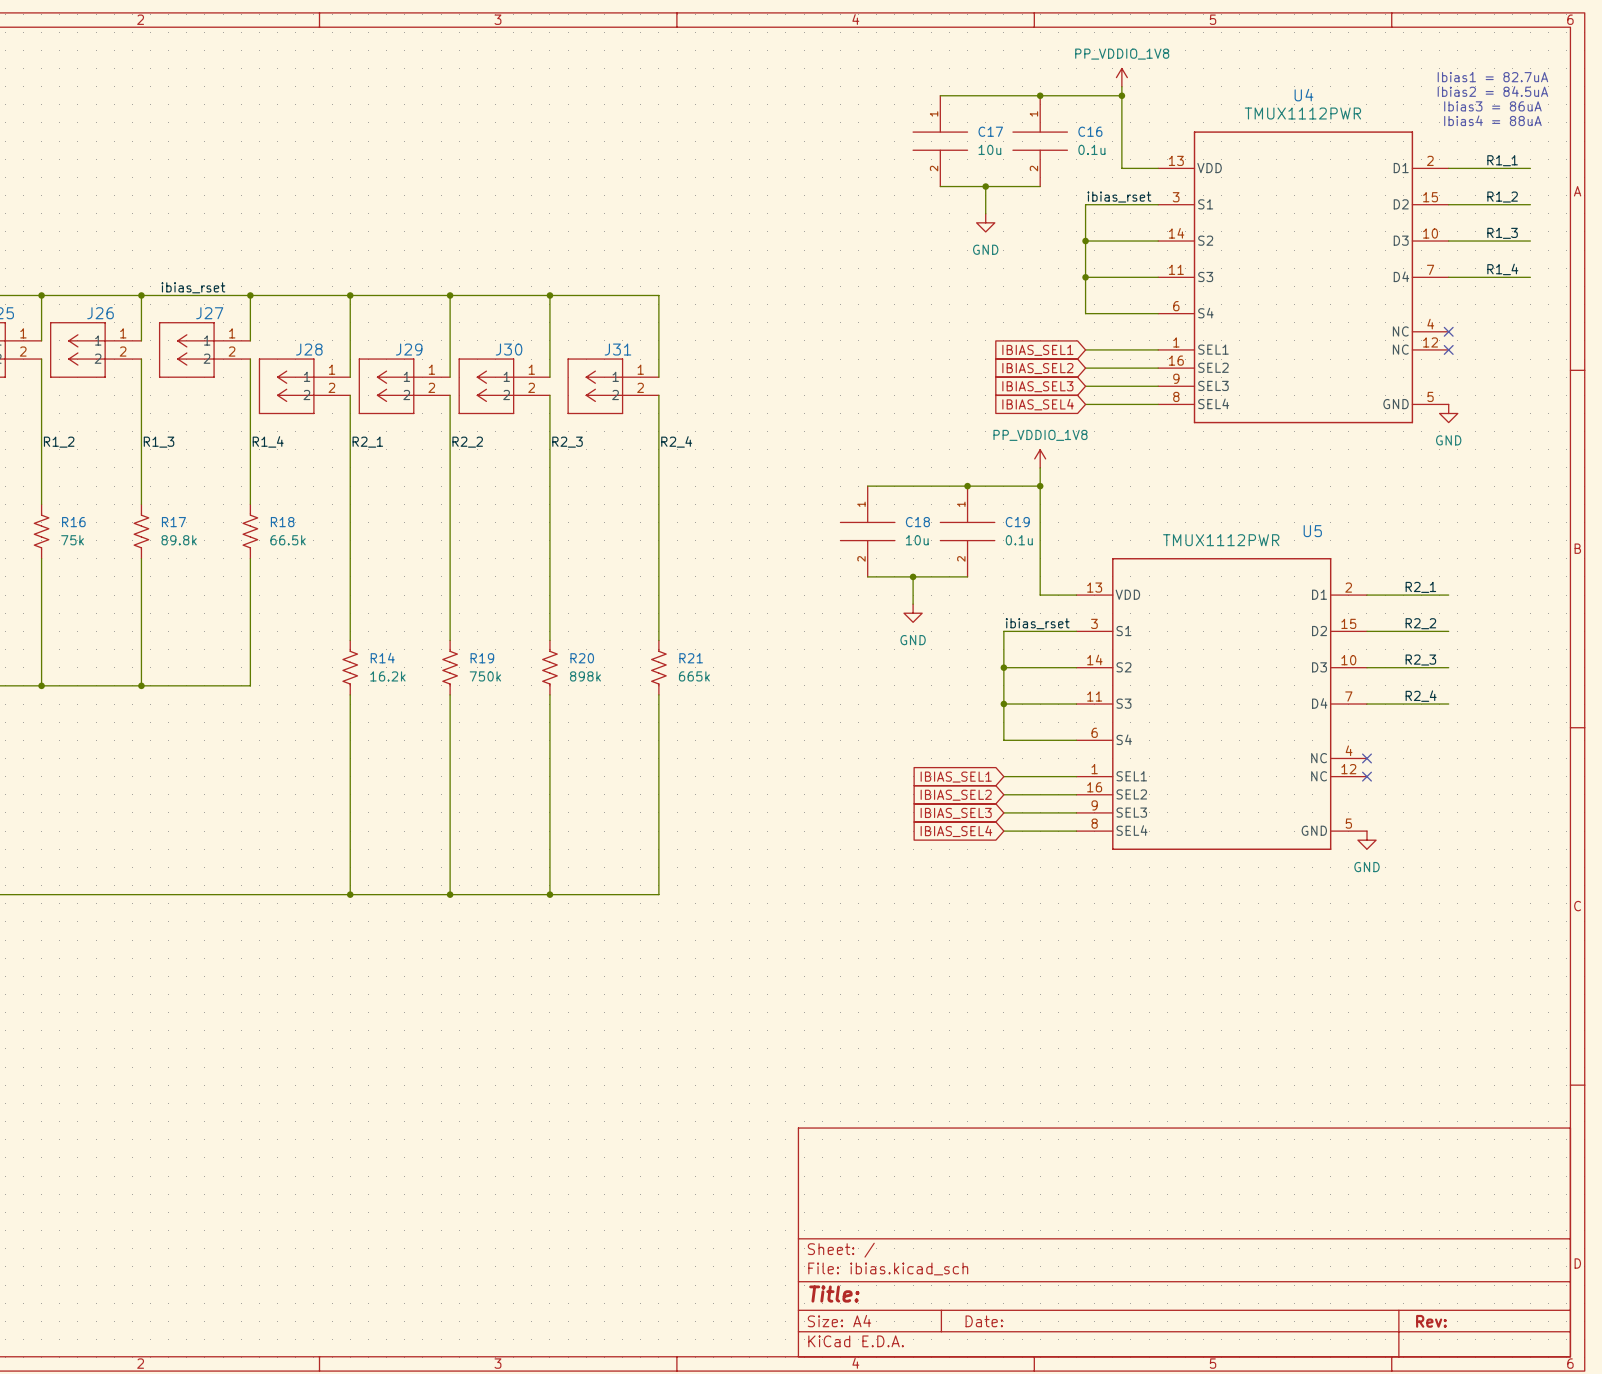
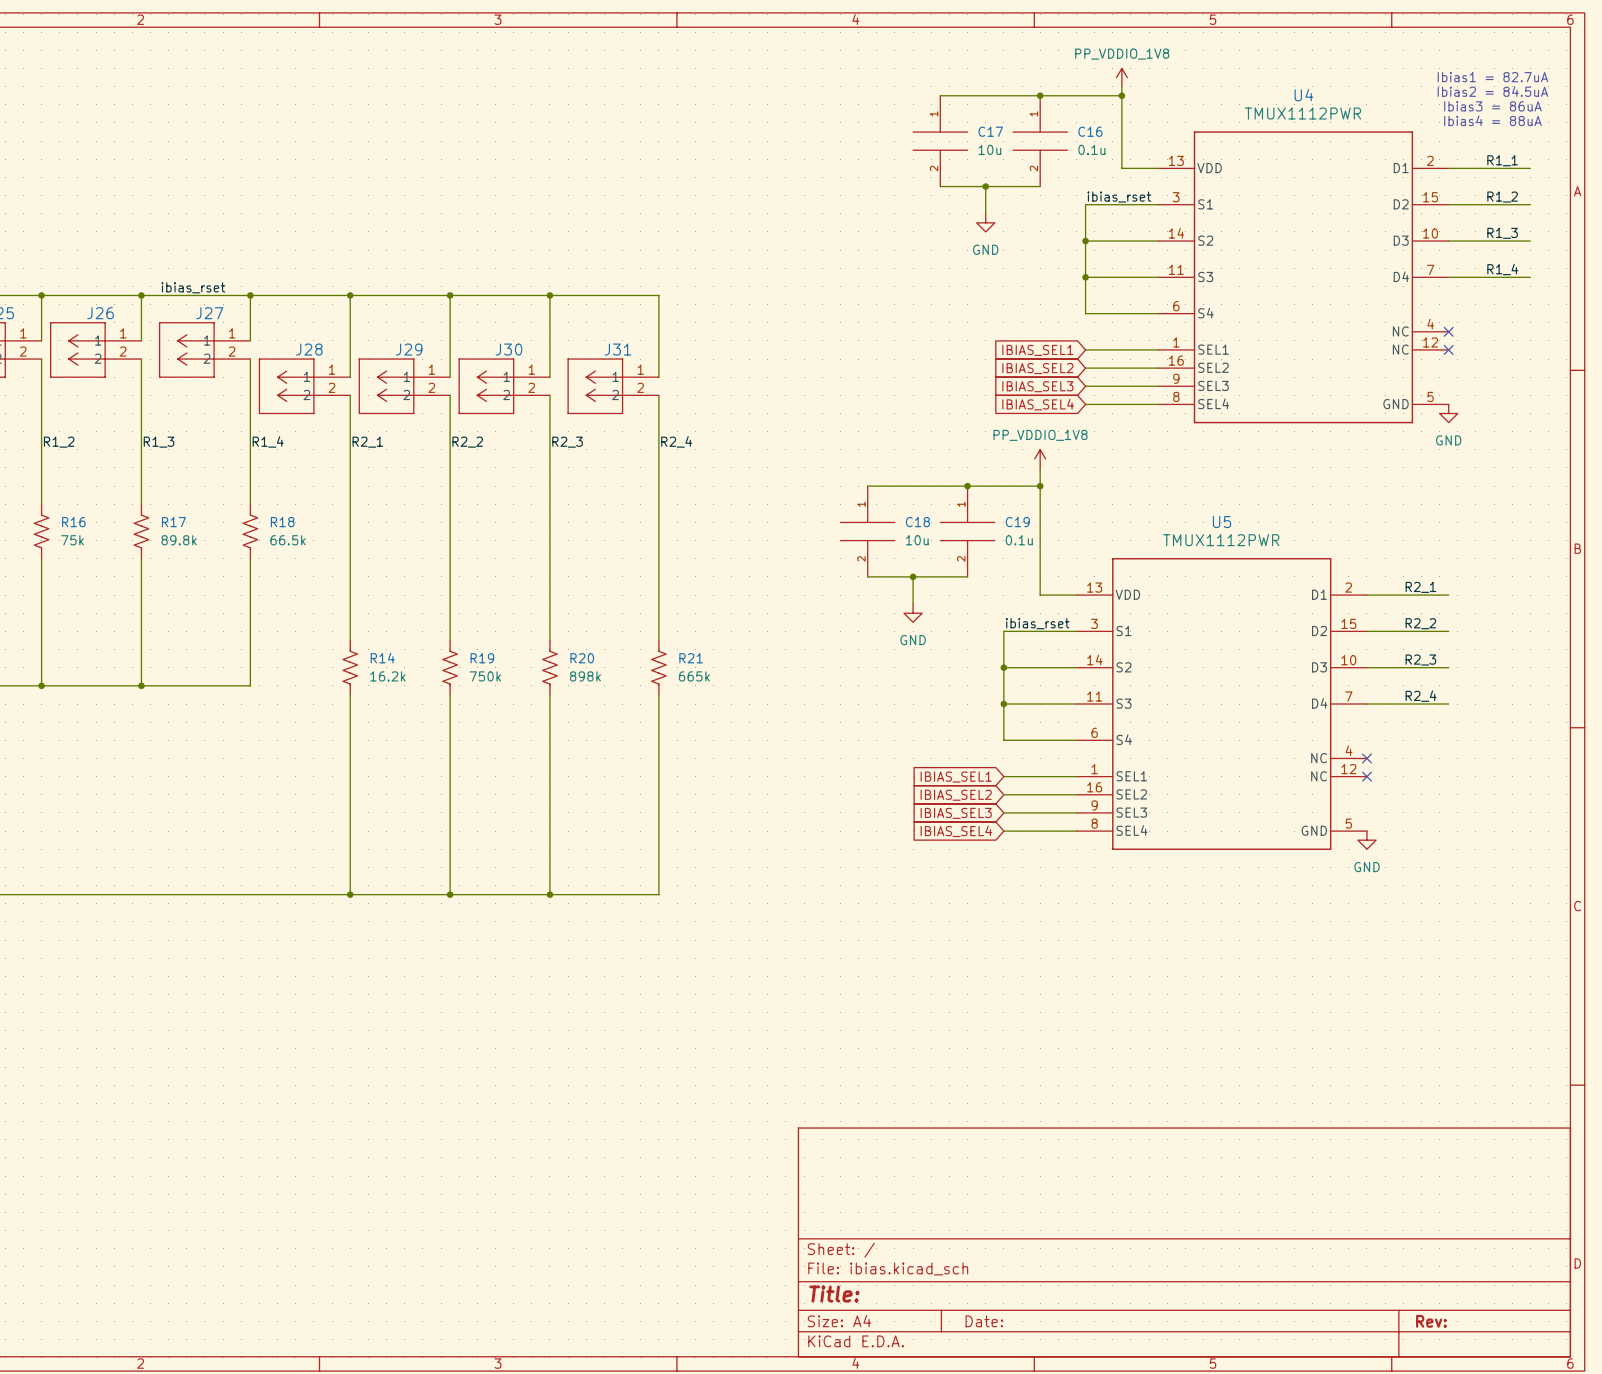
U5 name position: U5 (1312, 531) -> U5 (1222, 522)

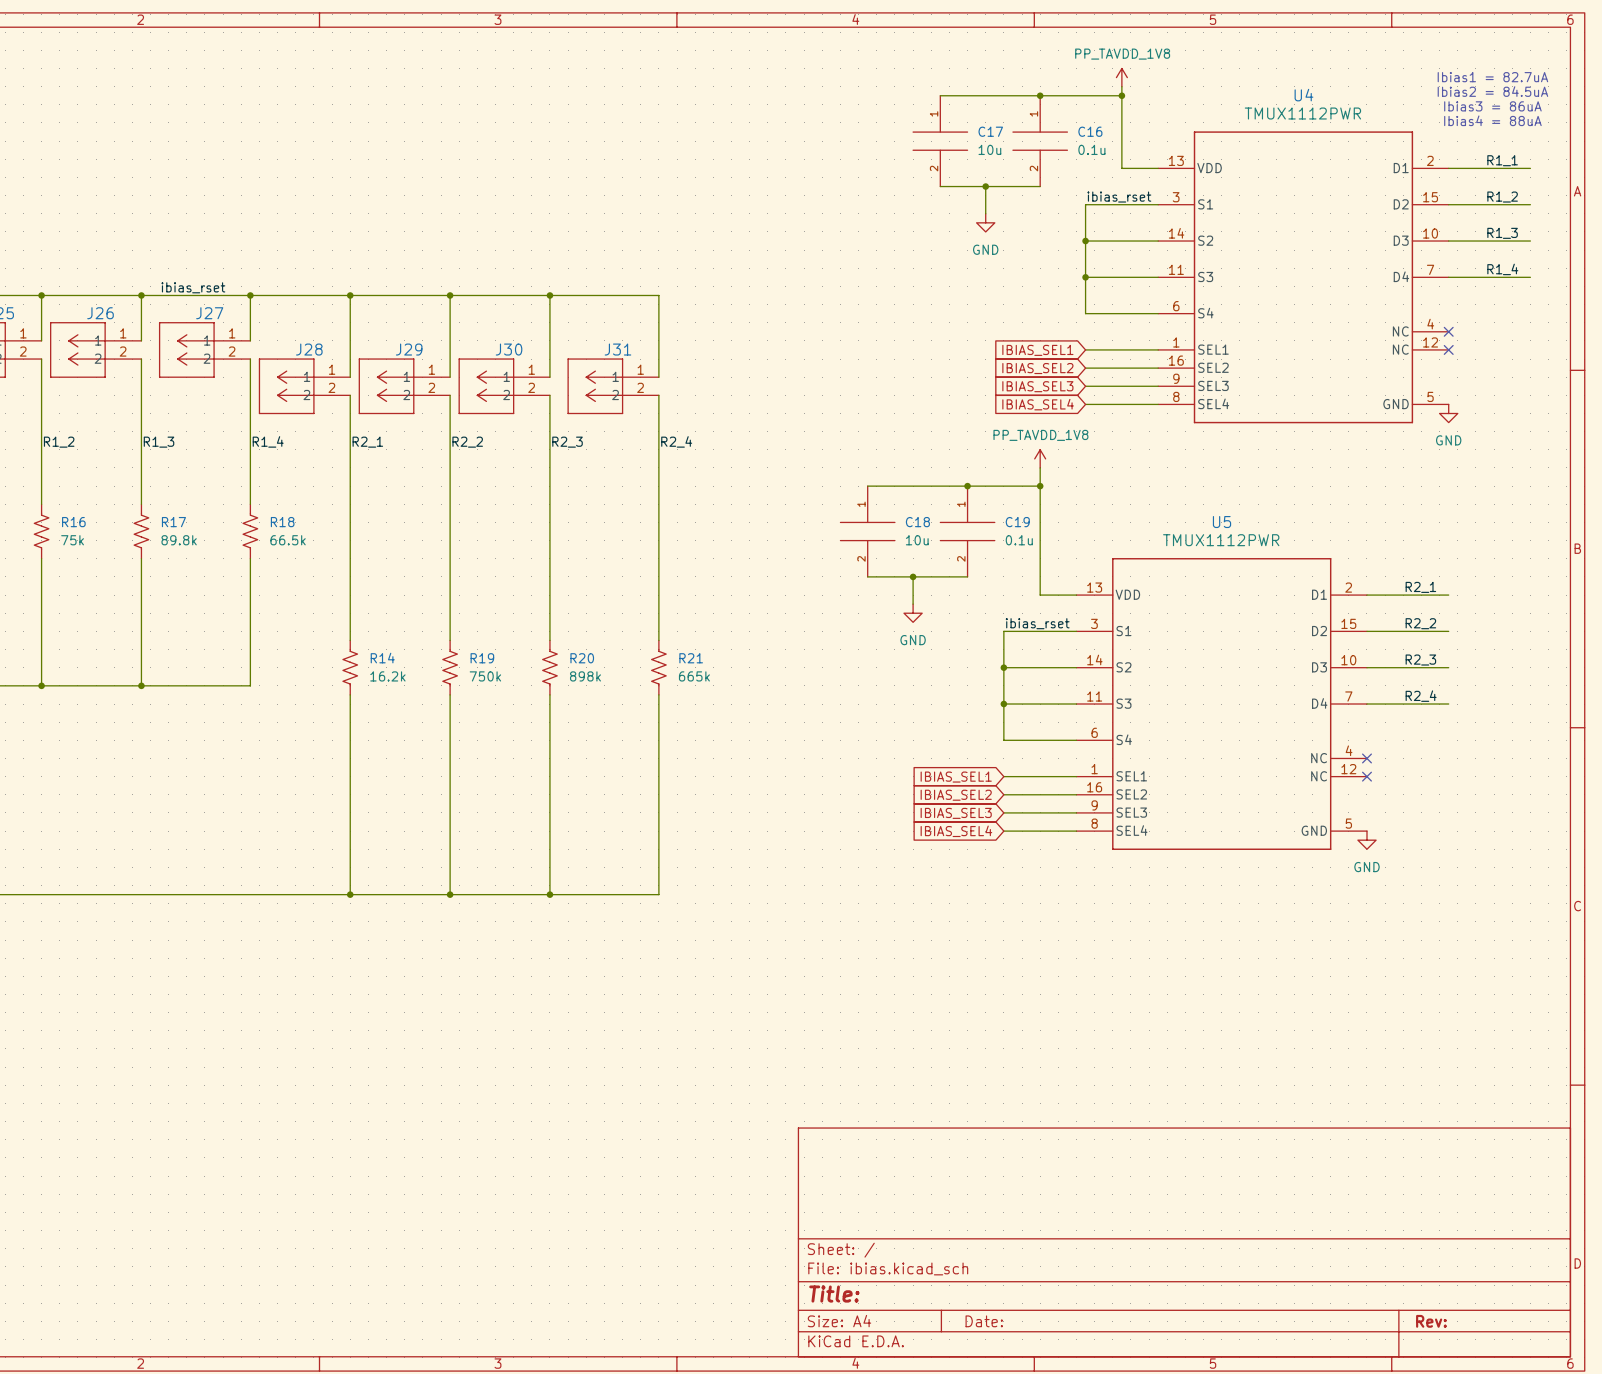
power symbol: PP_VDDIO_1V8 (1121, 77) -> PP_TAVDD_1V8 (1121, 77)
power symbol: PP_VDDIO_1V8 (1040, 458) -> PP_TAVDD_1V8 (1040, 458)

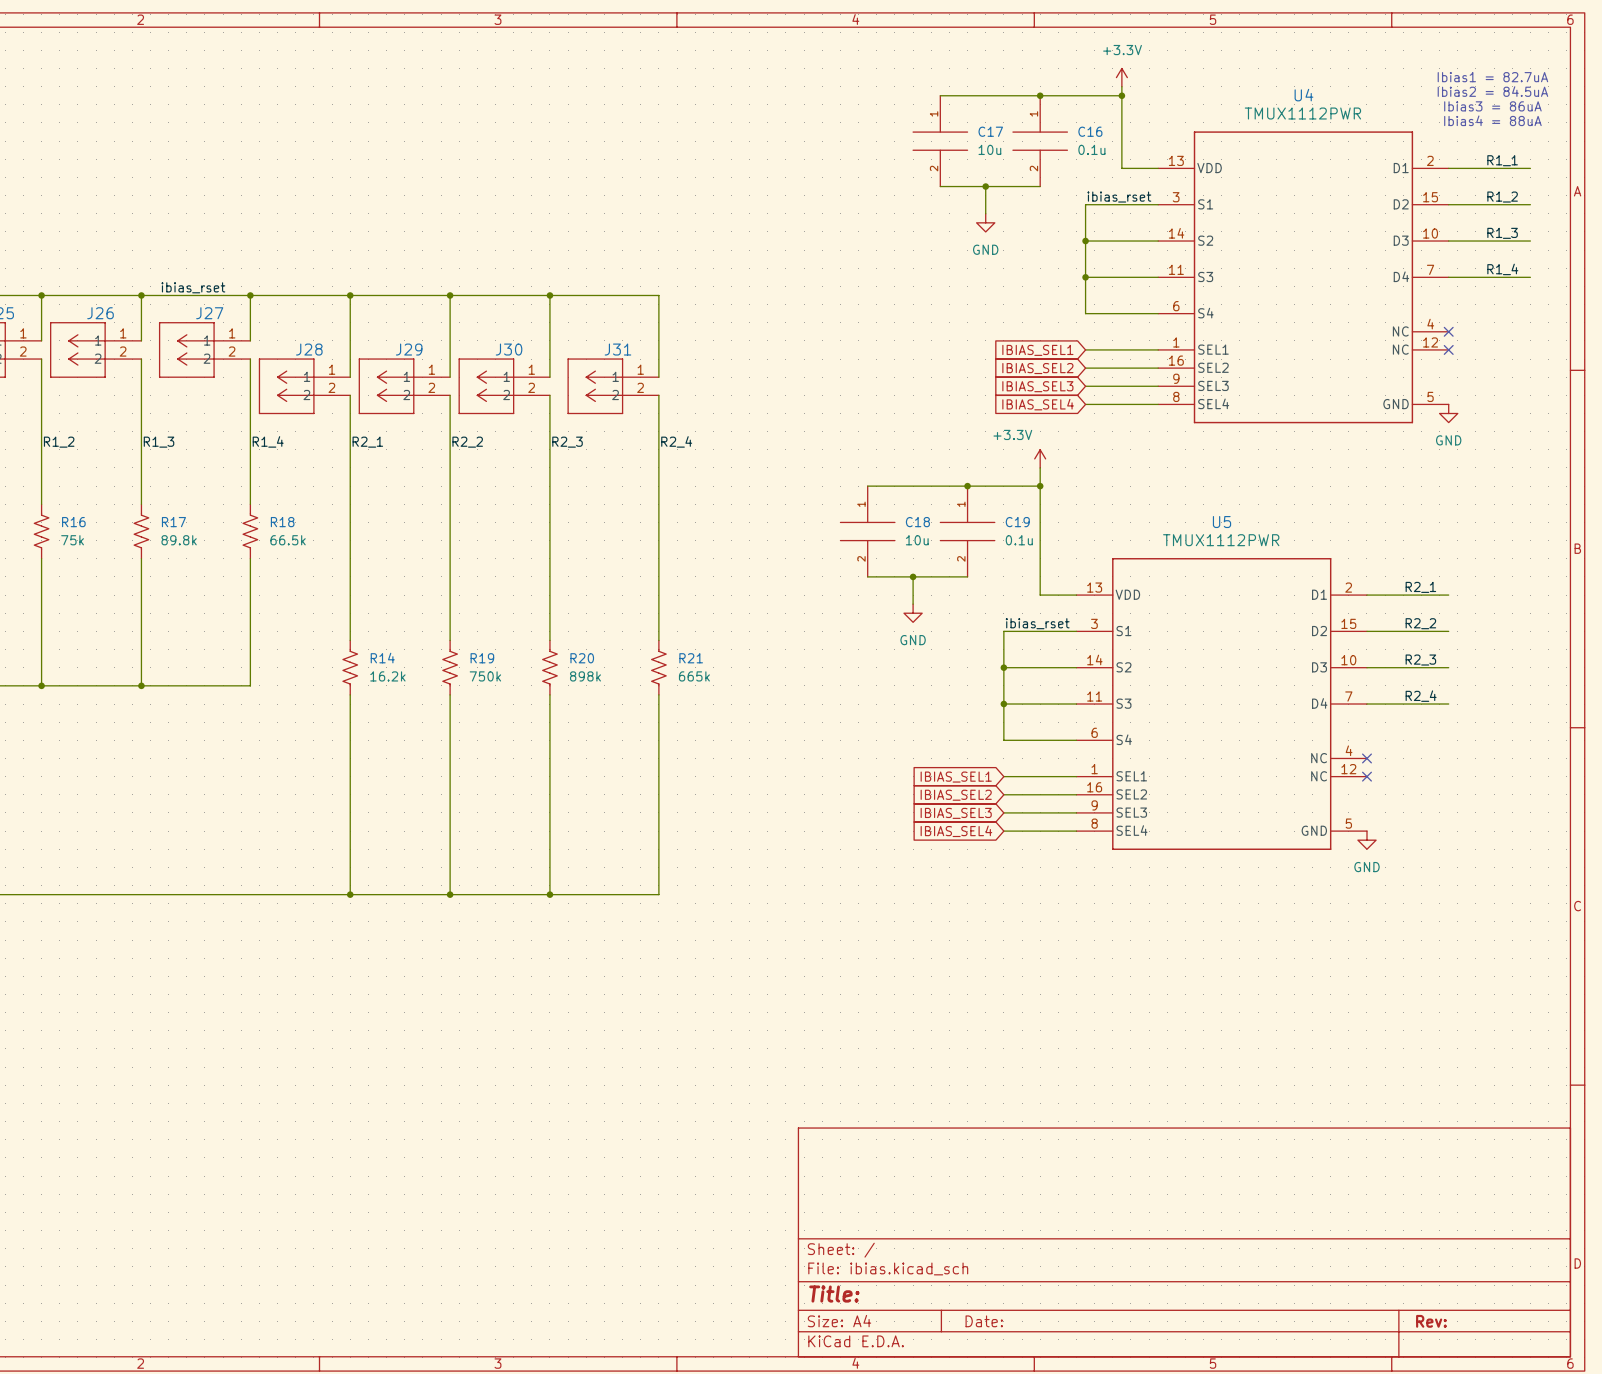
power symbol: PP_TAVDD_1V8 (1121, 77) -> +3.3V (1121, 77)
power symbol: PP_TAVDD_1V8 (1040, 458) -> +3.3V (1040, 458)

